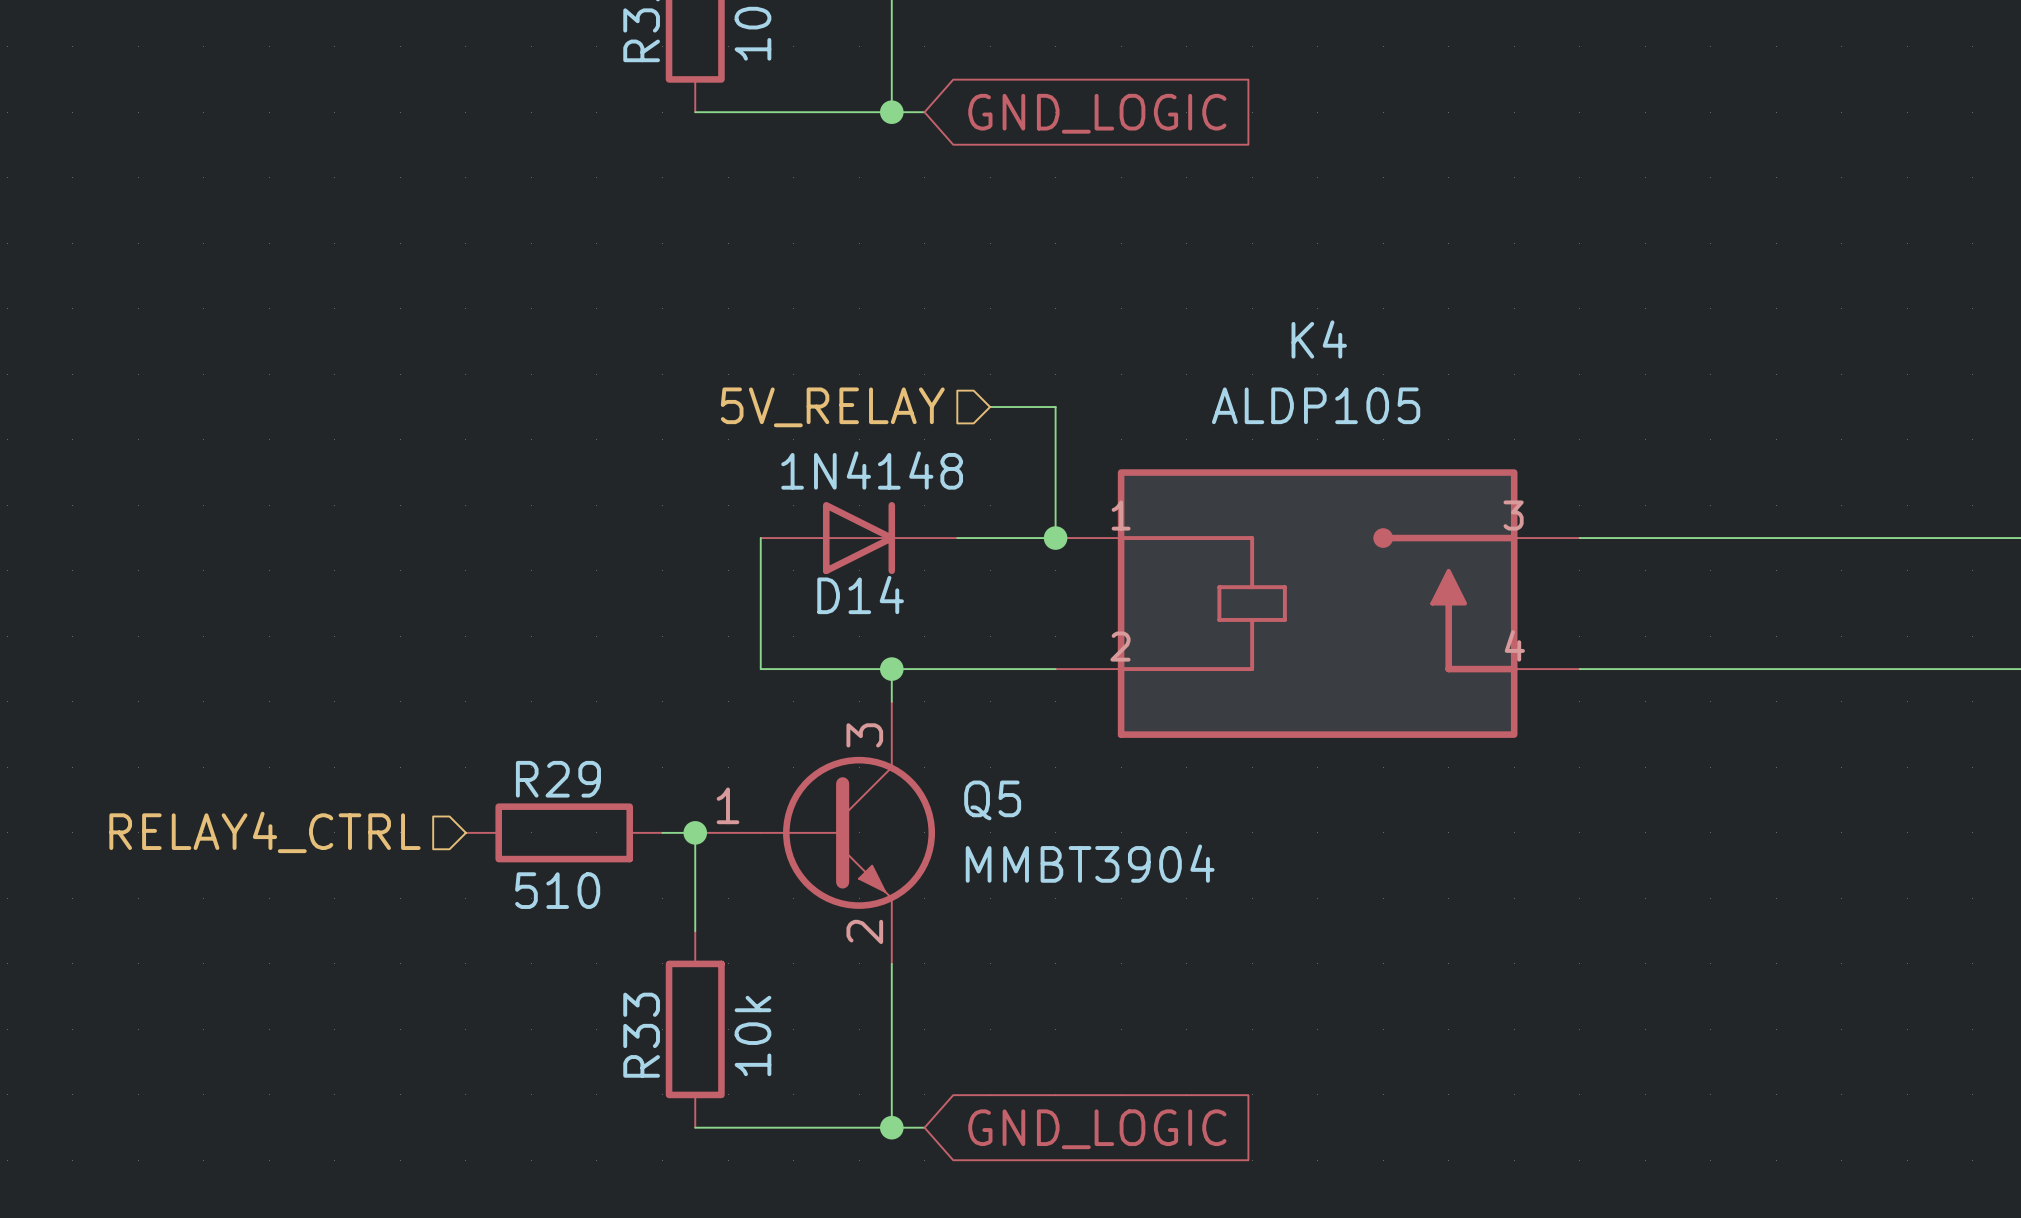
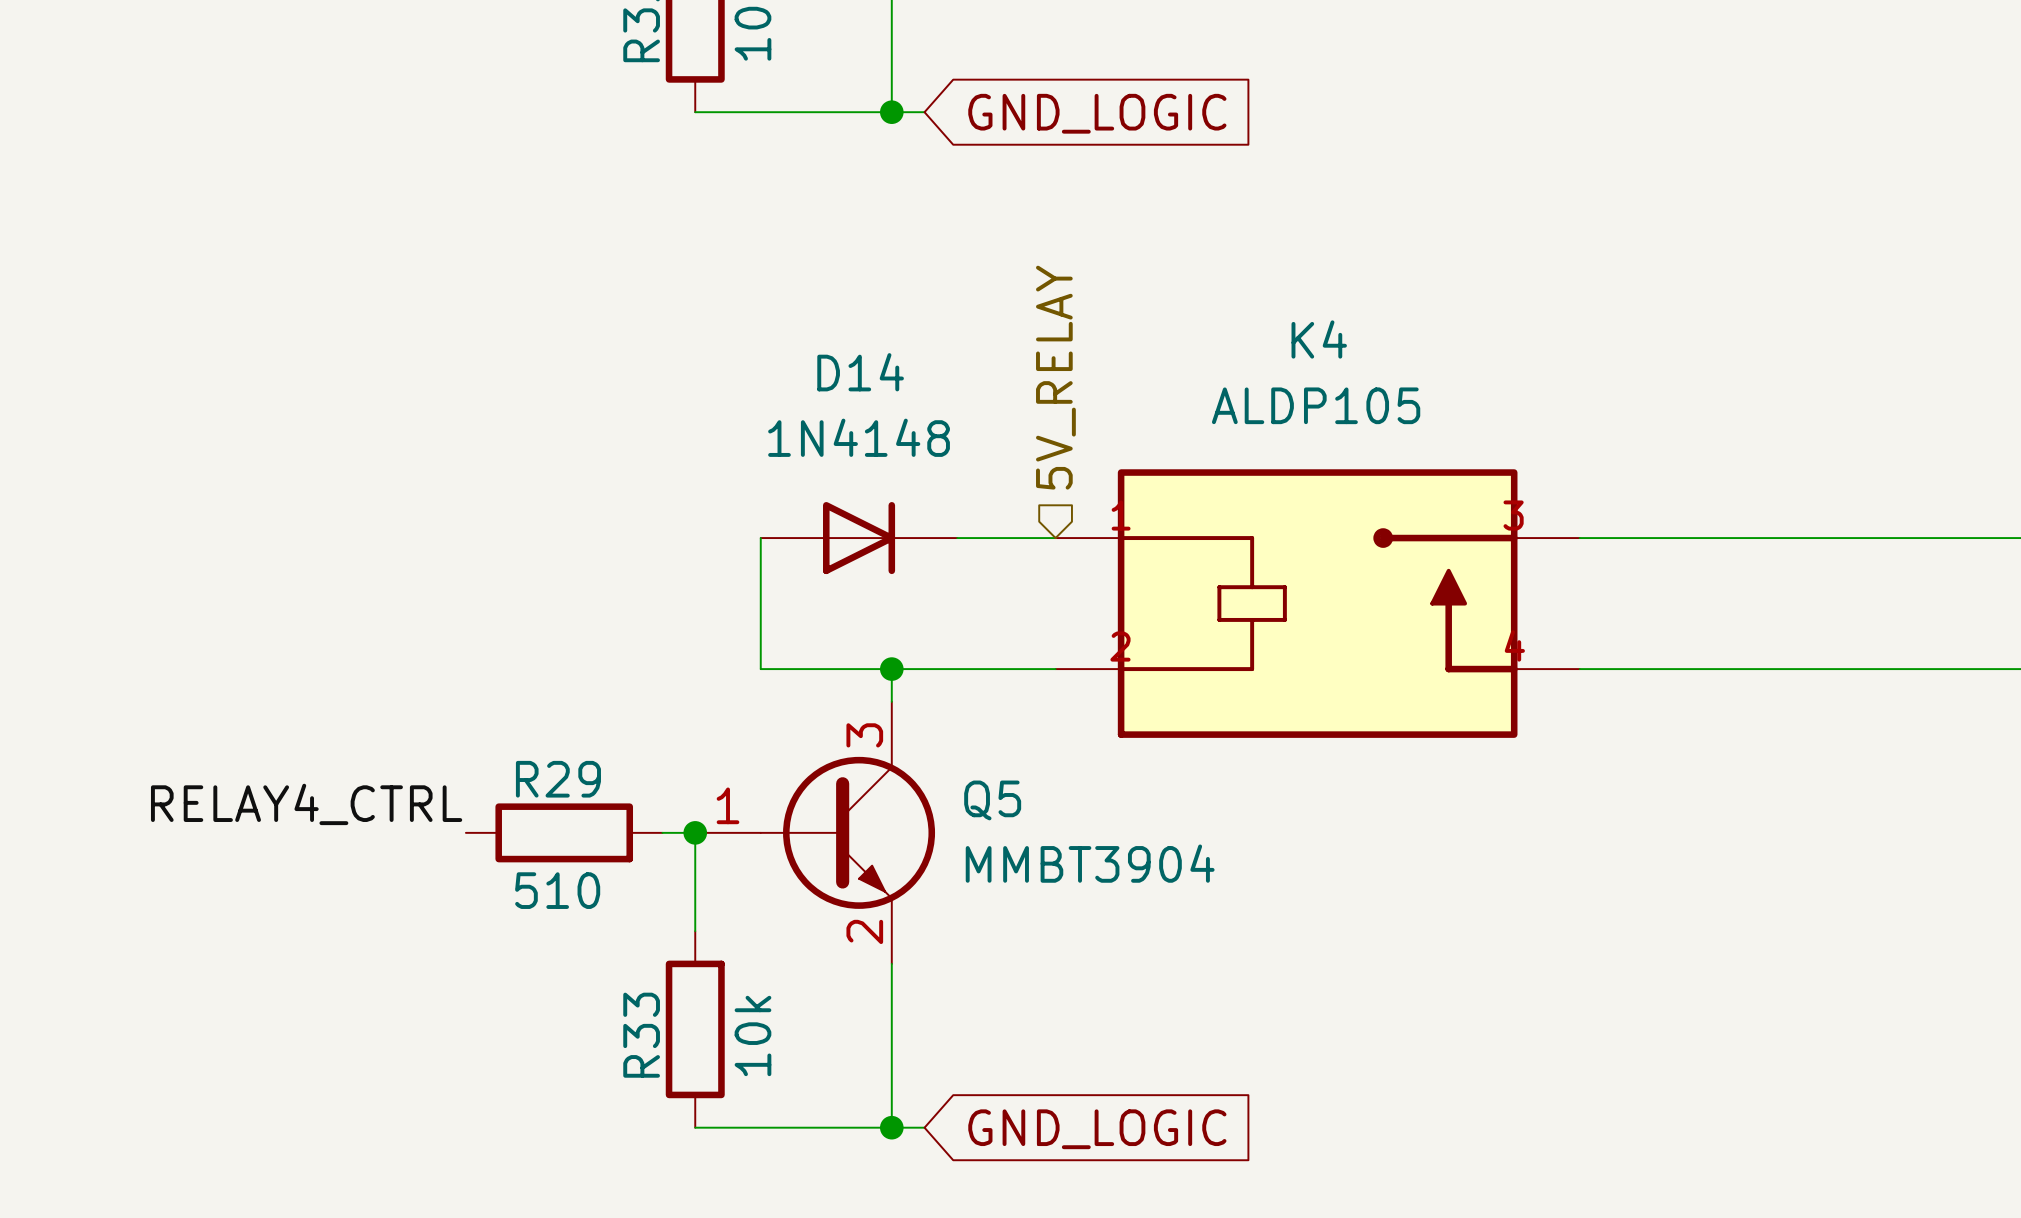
hierarchical label rotation: 0° (832, 407) -> 90° clockwise (1055, 377)
wire: (990, 407) (1055, 407) (1055, 538) -> none
D14 value position: 1N4148 (872, 470) -> 1N4148 (859, 437)
junction: (1055, 538) -> none
D14 name position: D14 (860, 595) -> D14 (860, 372)
label: none -> RELAY4_CTRL (306, 804)
hierarchical label: RELAY4_CTRL (264, 832) -> none

